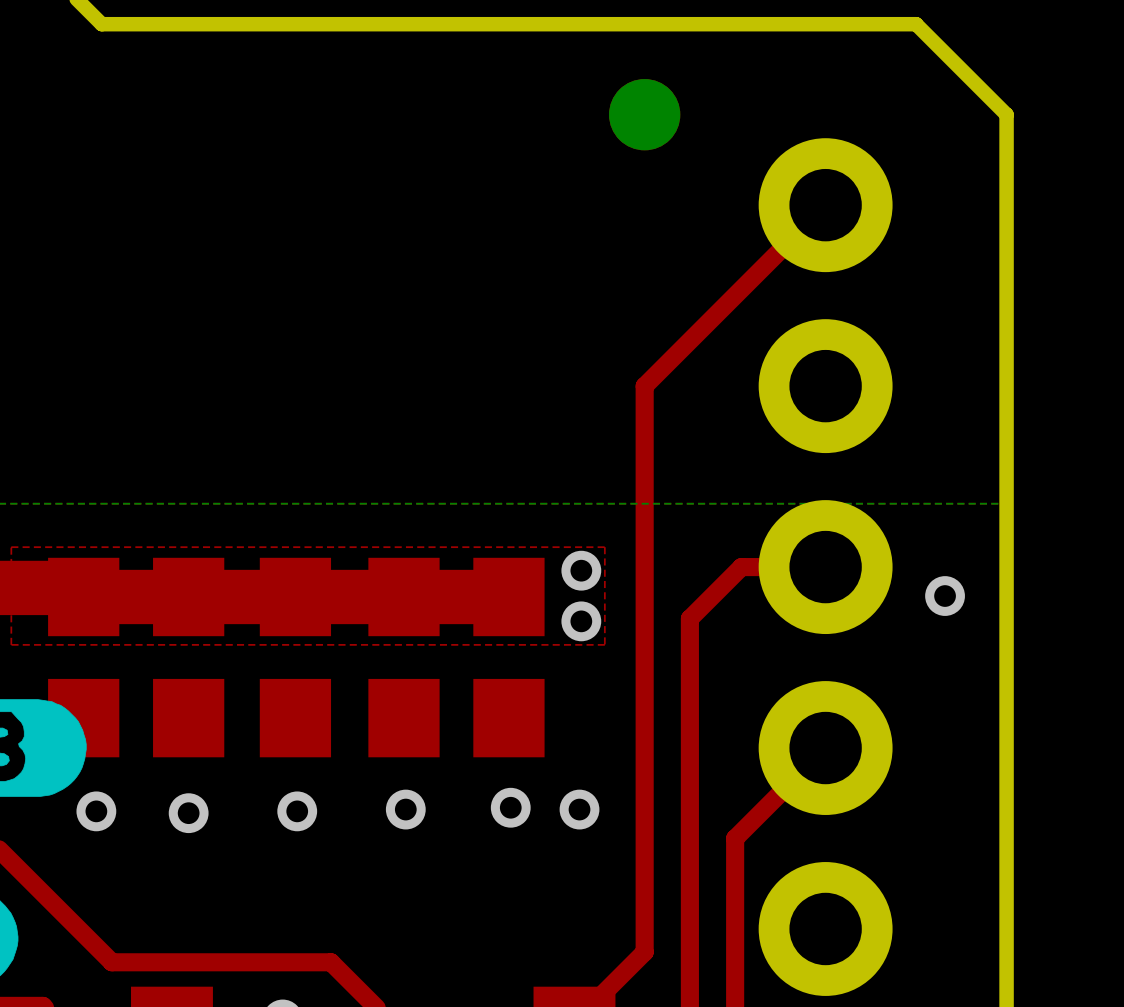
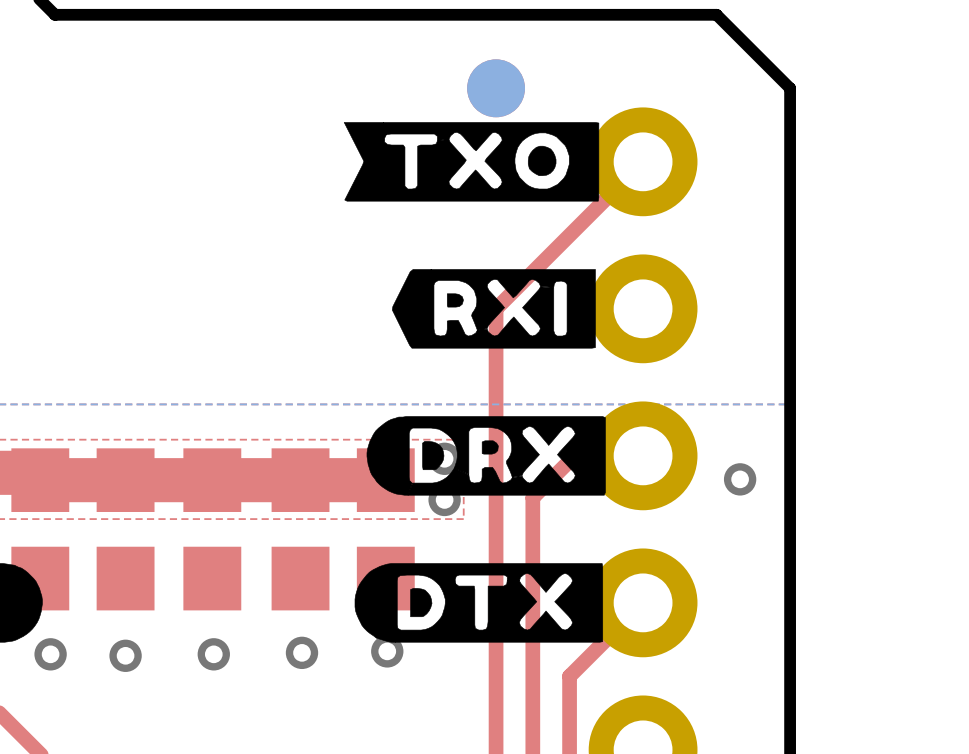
drawing: none -> [343, 122, 606, 643]
via: (579, 809) -> none

